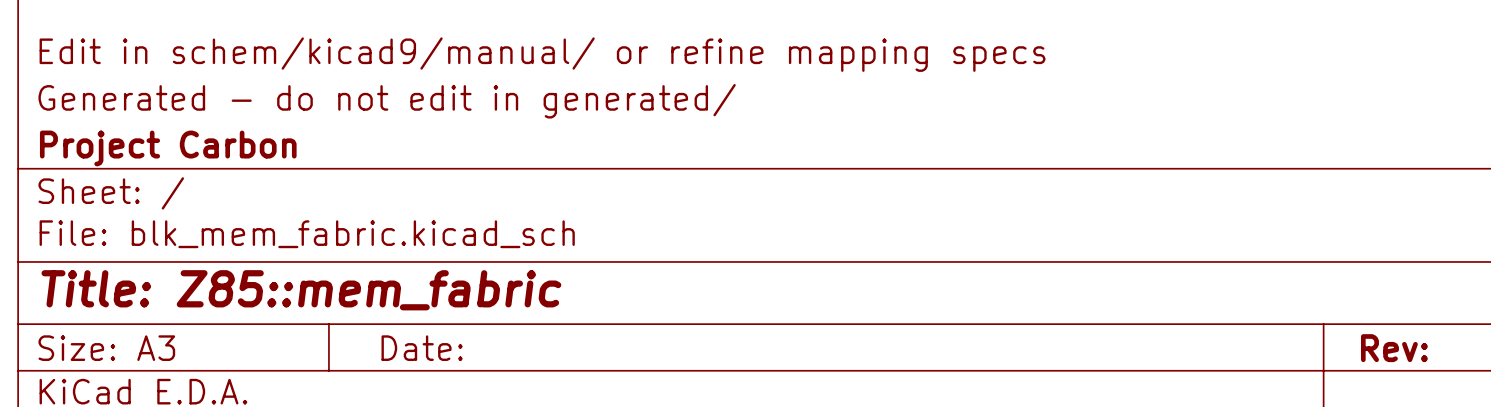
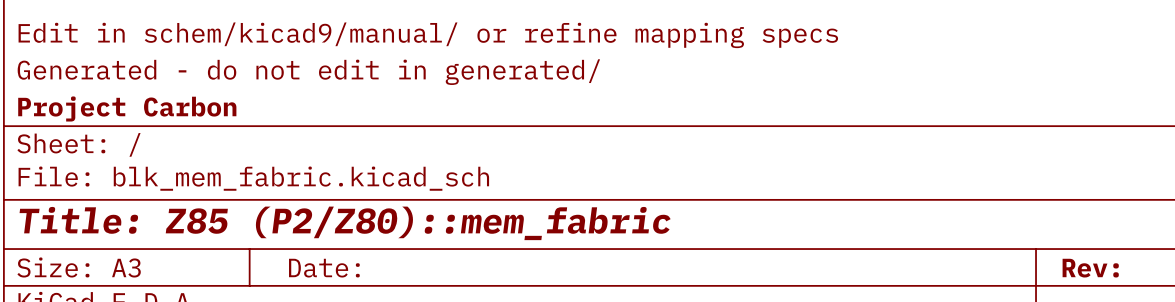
title block: Title: Z85::mem_fabric (301, 290) -> Title: Z85 (P2/Z80)::mem_fabric (345, 223)

